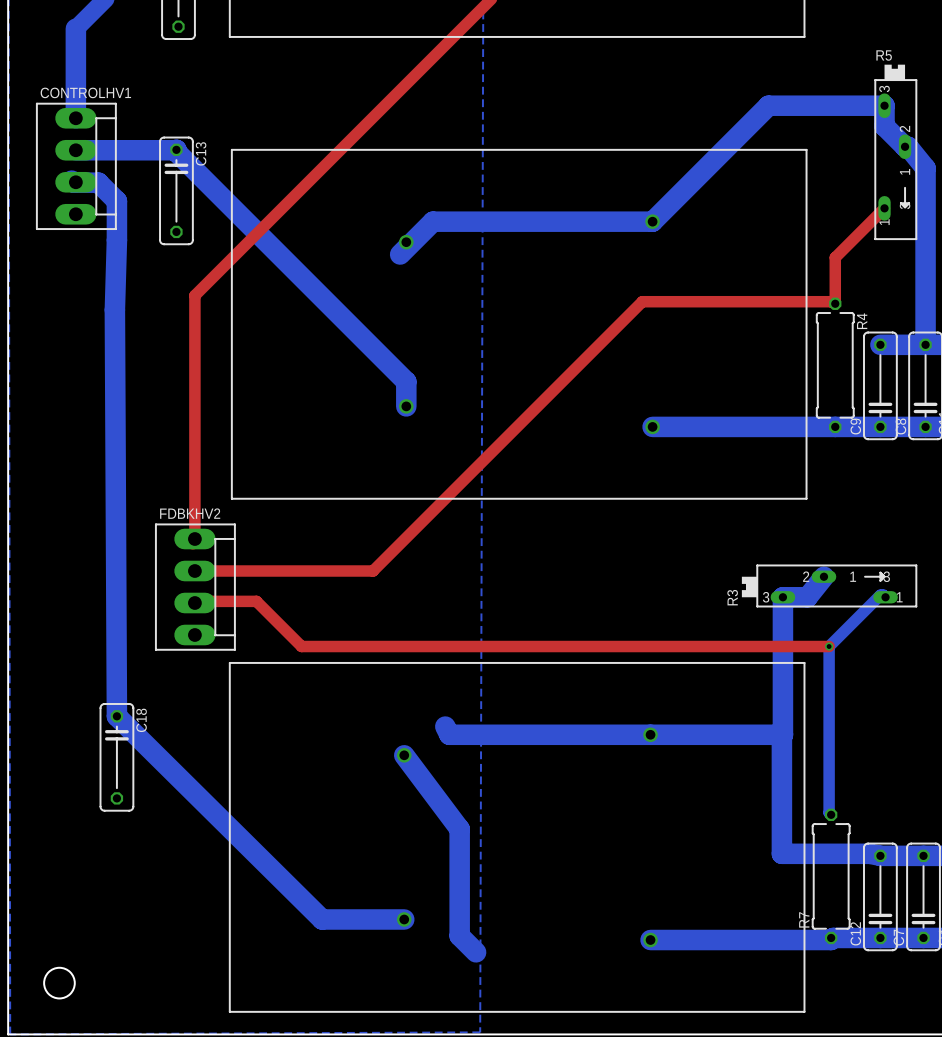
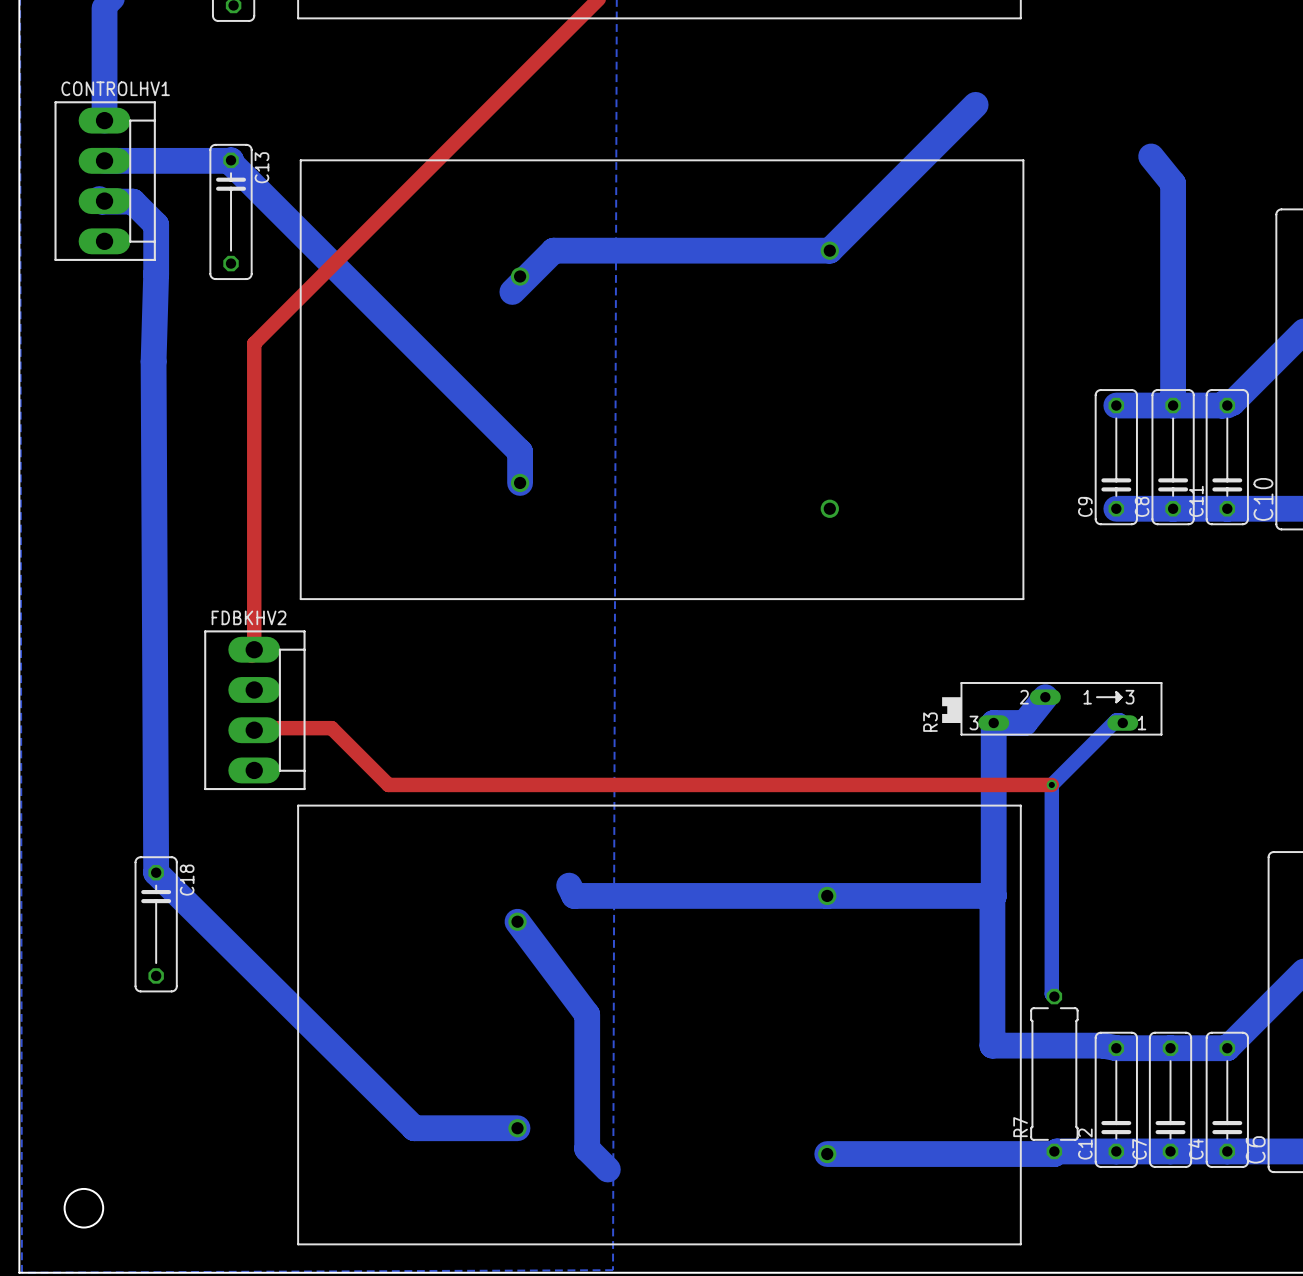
bottom track: (768, 105) (884, 105) (884, 126) (905, 146) (908, 146) -> none
R5: (895, 152) -> none
top track: (884, 208) (835, 257) (835, 303) (831, 301) (642, 301) (373, 571) (194, 571) -> none
R4: (835, 365) -> none
bottom track: (652, 426) (880, 426) -> none

